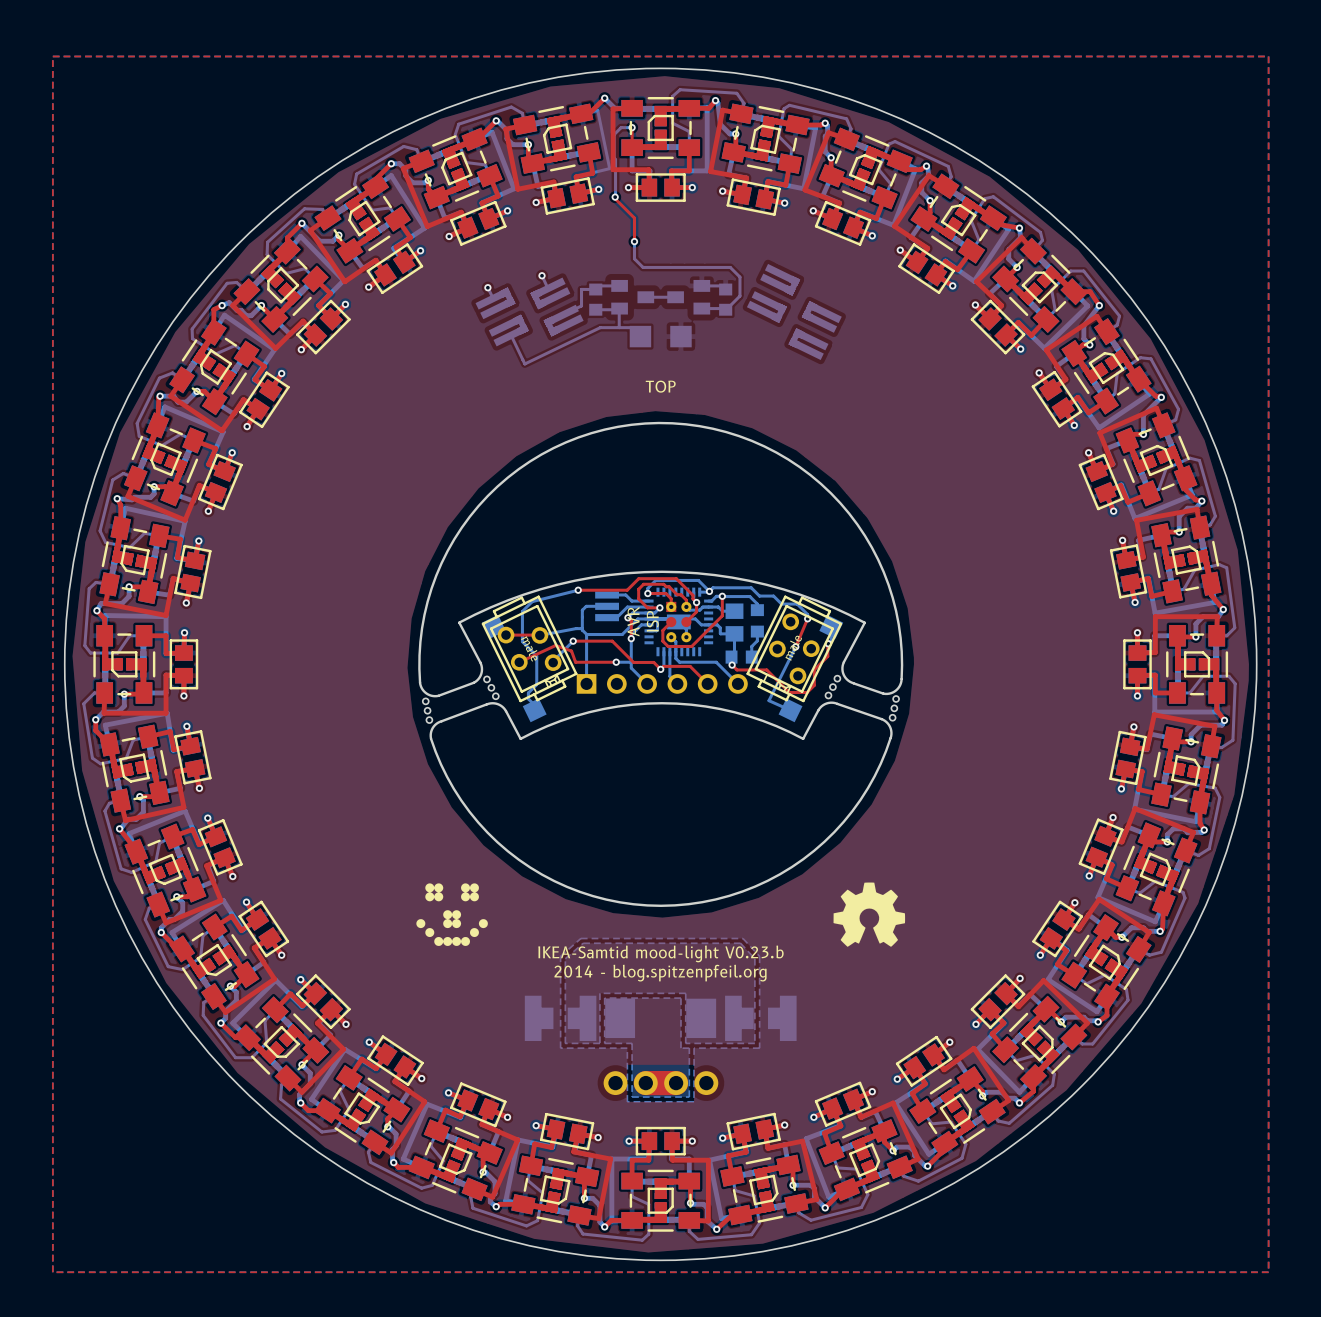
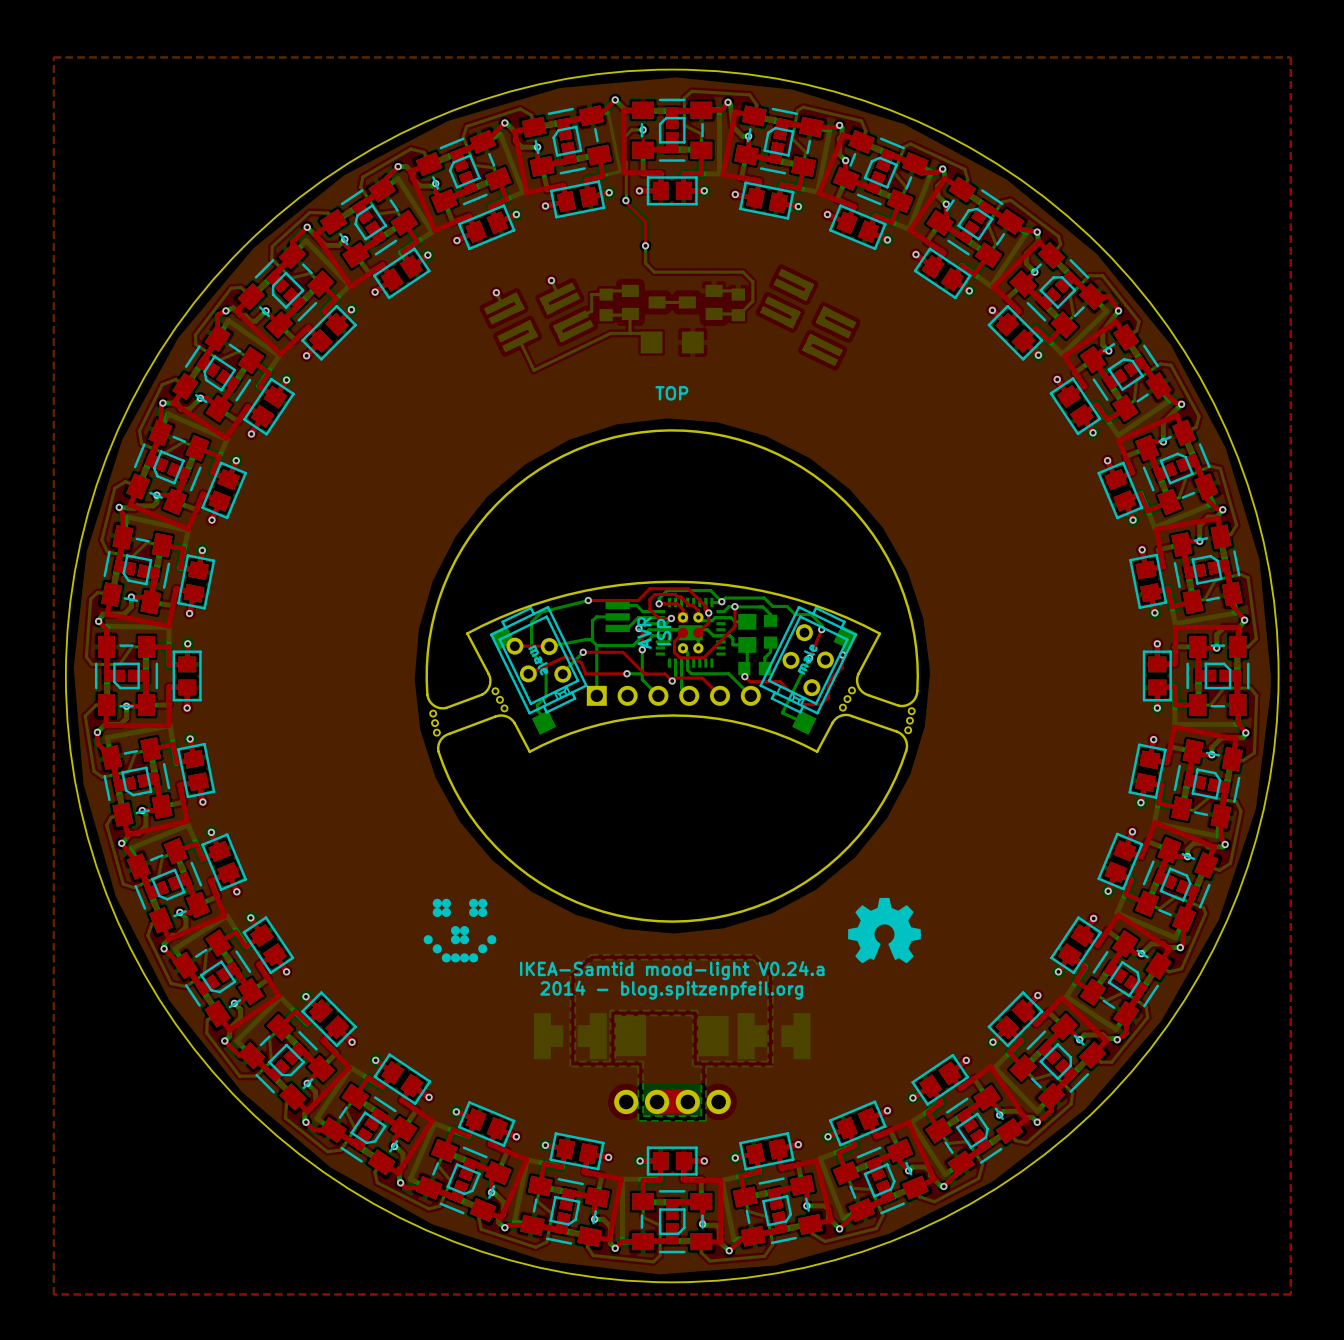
text: IKEA-Samtid mood-light V0.23.b (660, 953) -> IKEA-Samtid mood-light V0.24.a (672, 970)

